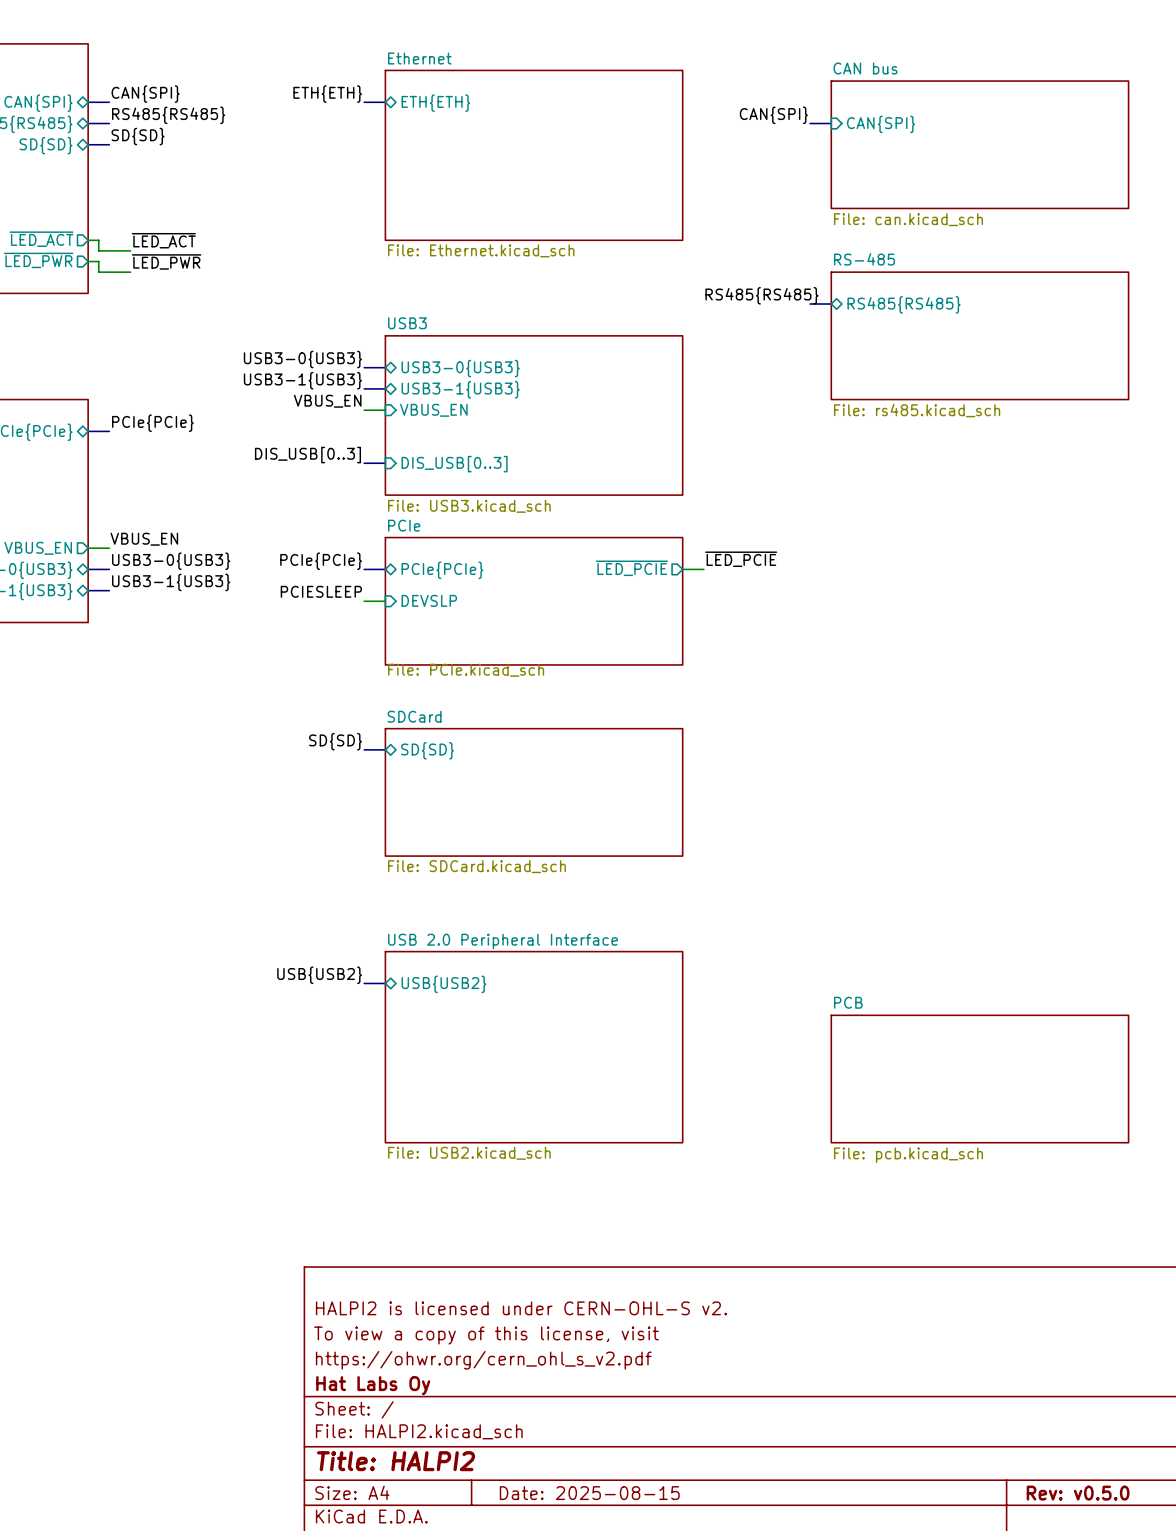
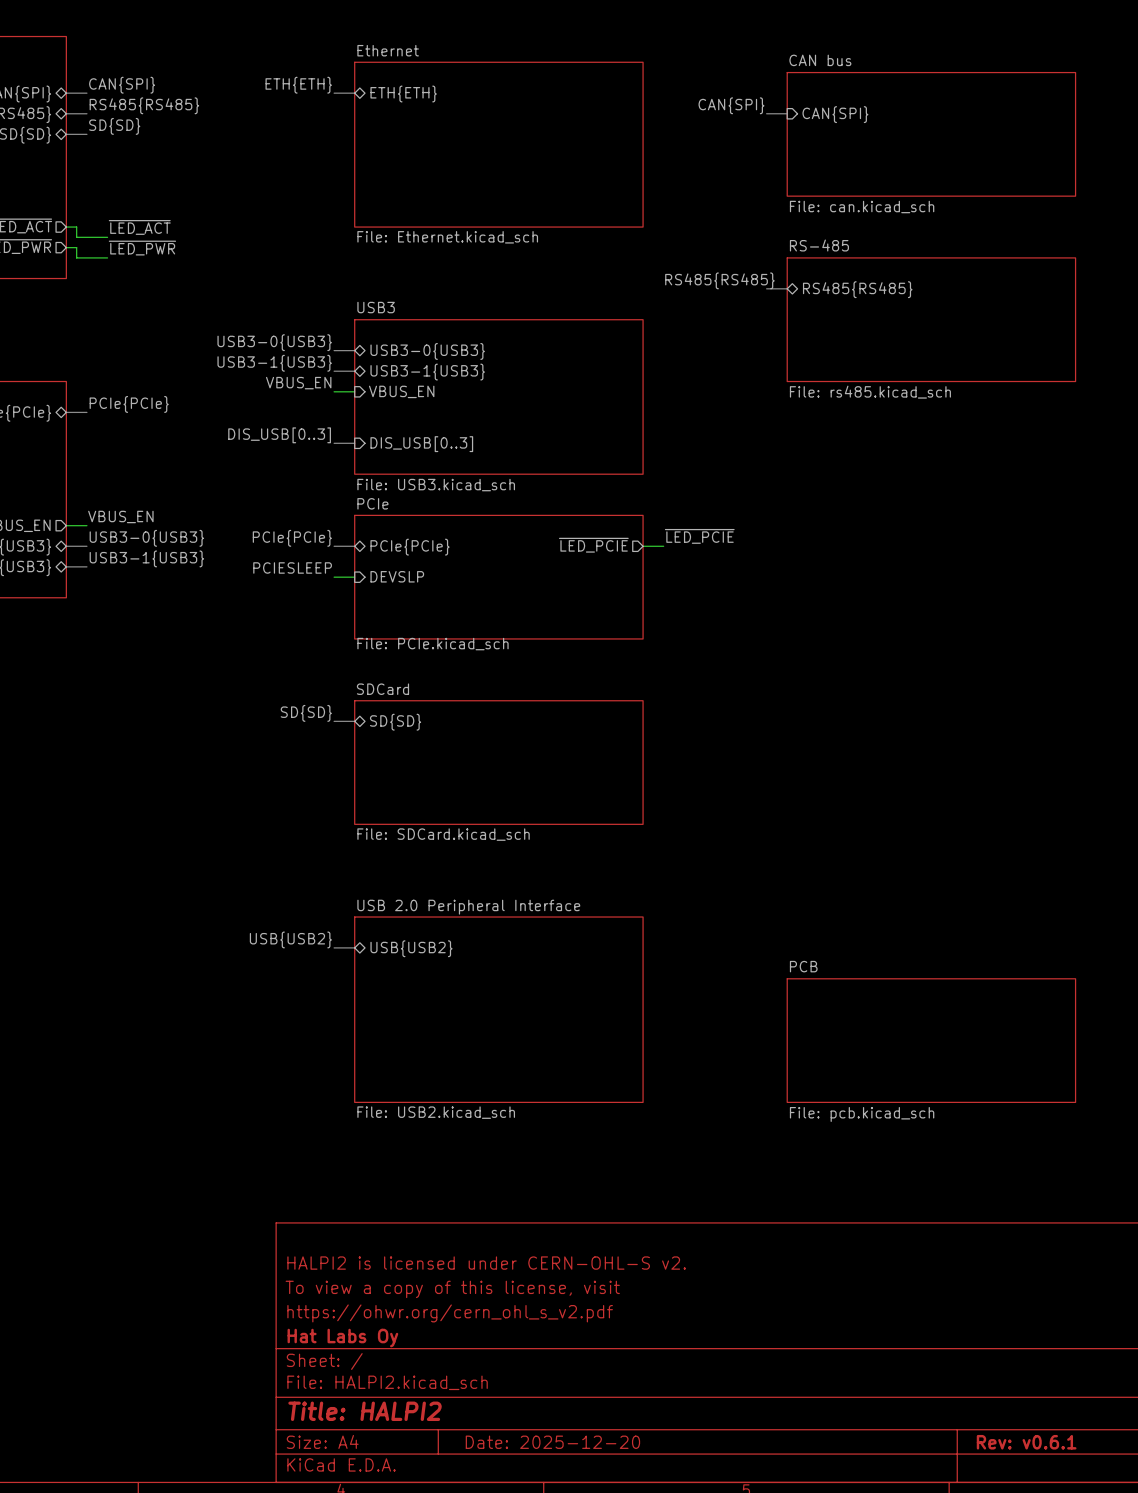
title block: Date: 2025-08-15 (589, 1493) -> Date: 2025-12-20 (552, 1442)
title block: Rev: v0.5.0 (1078, 1493) -> Rev: v0.6.1 (1026, 1442)

